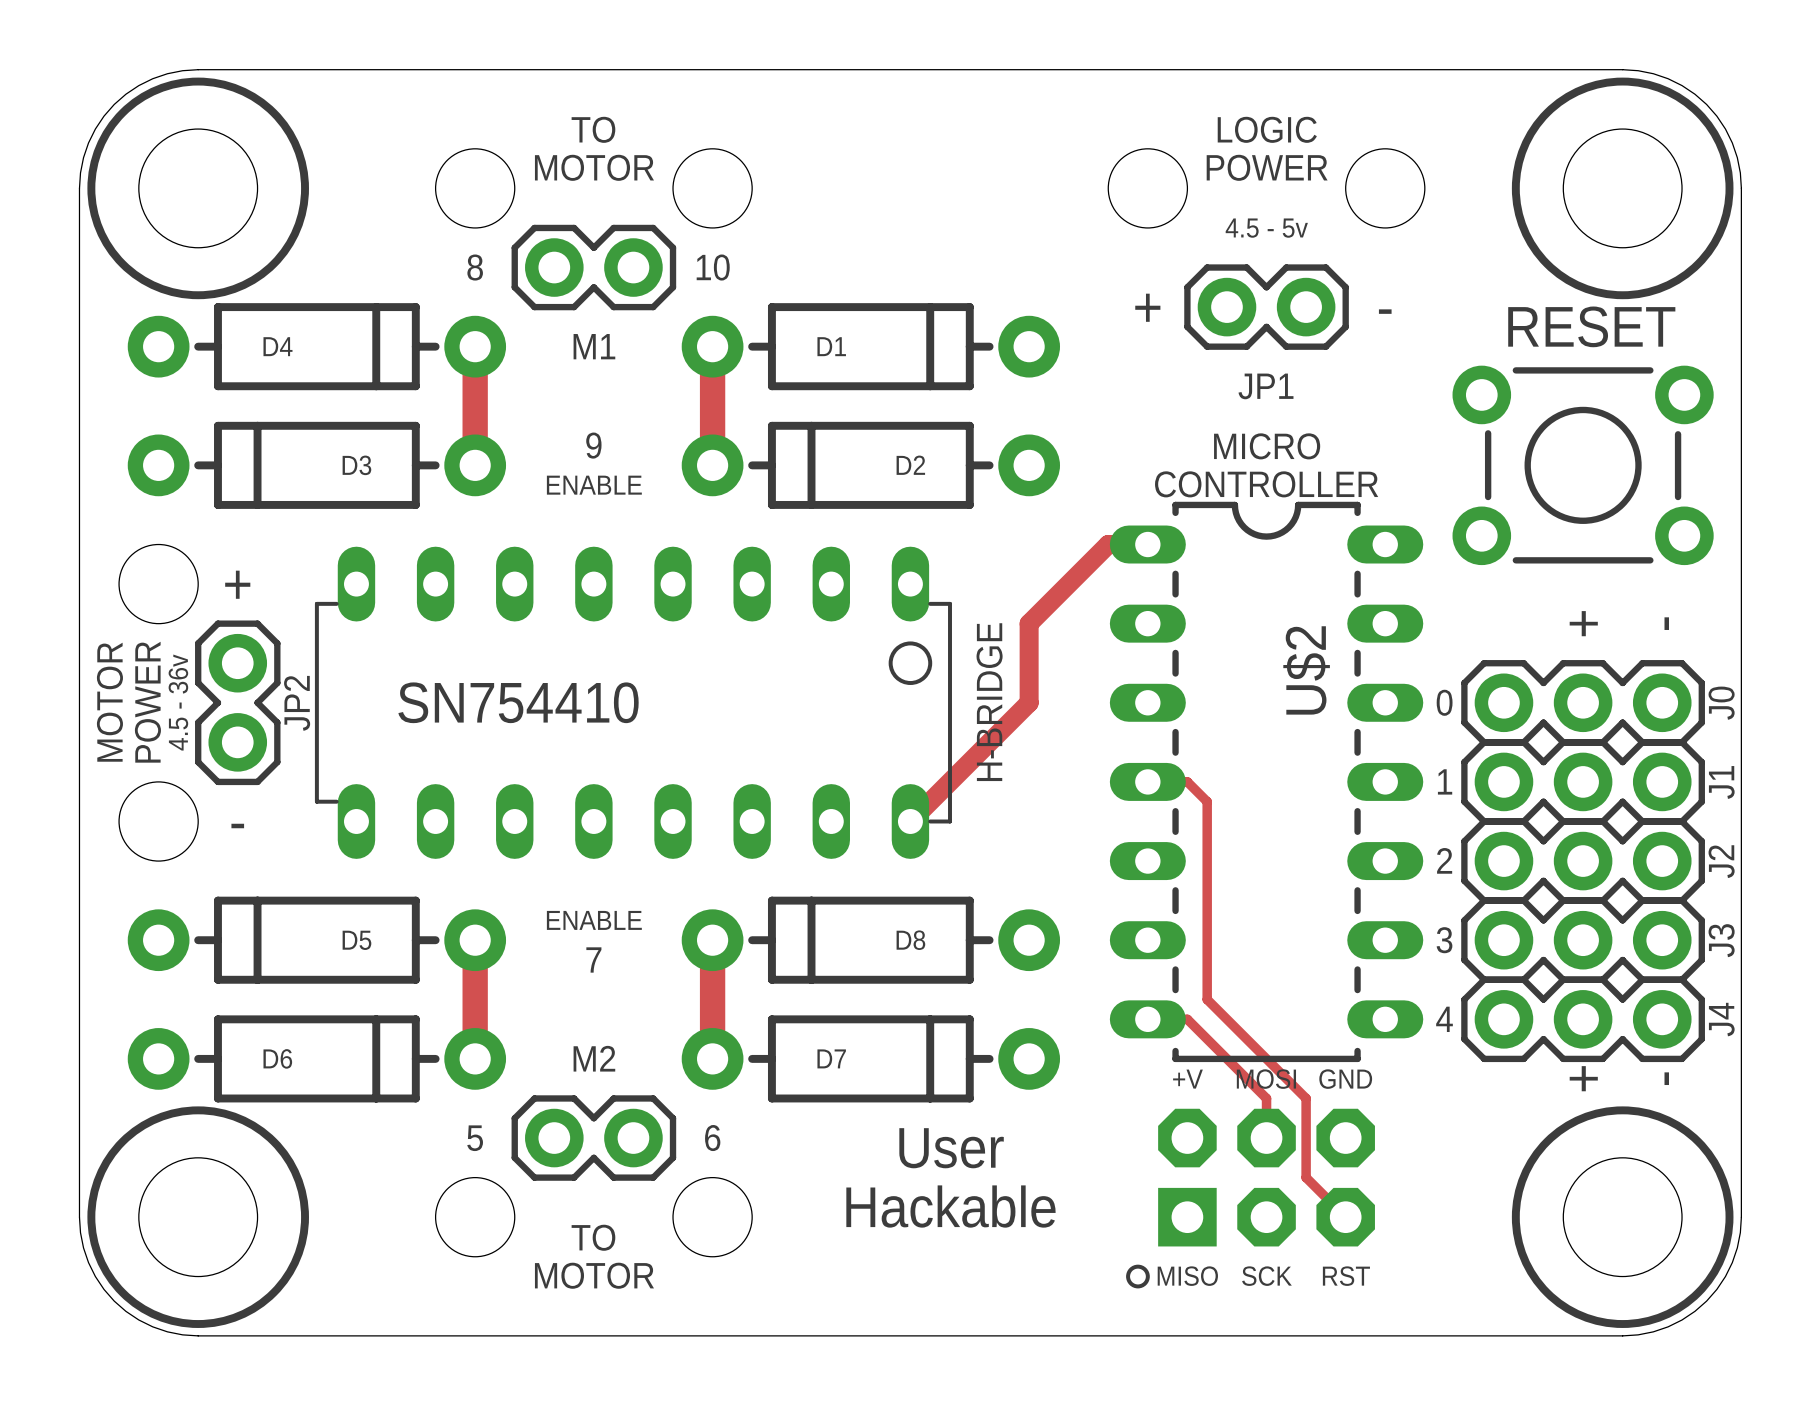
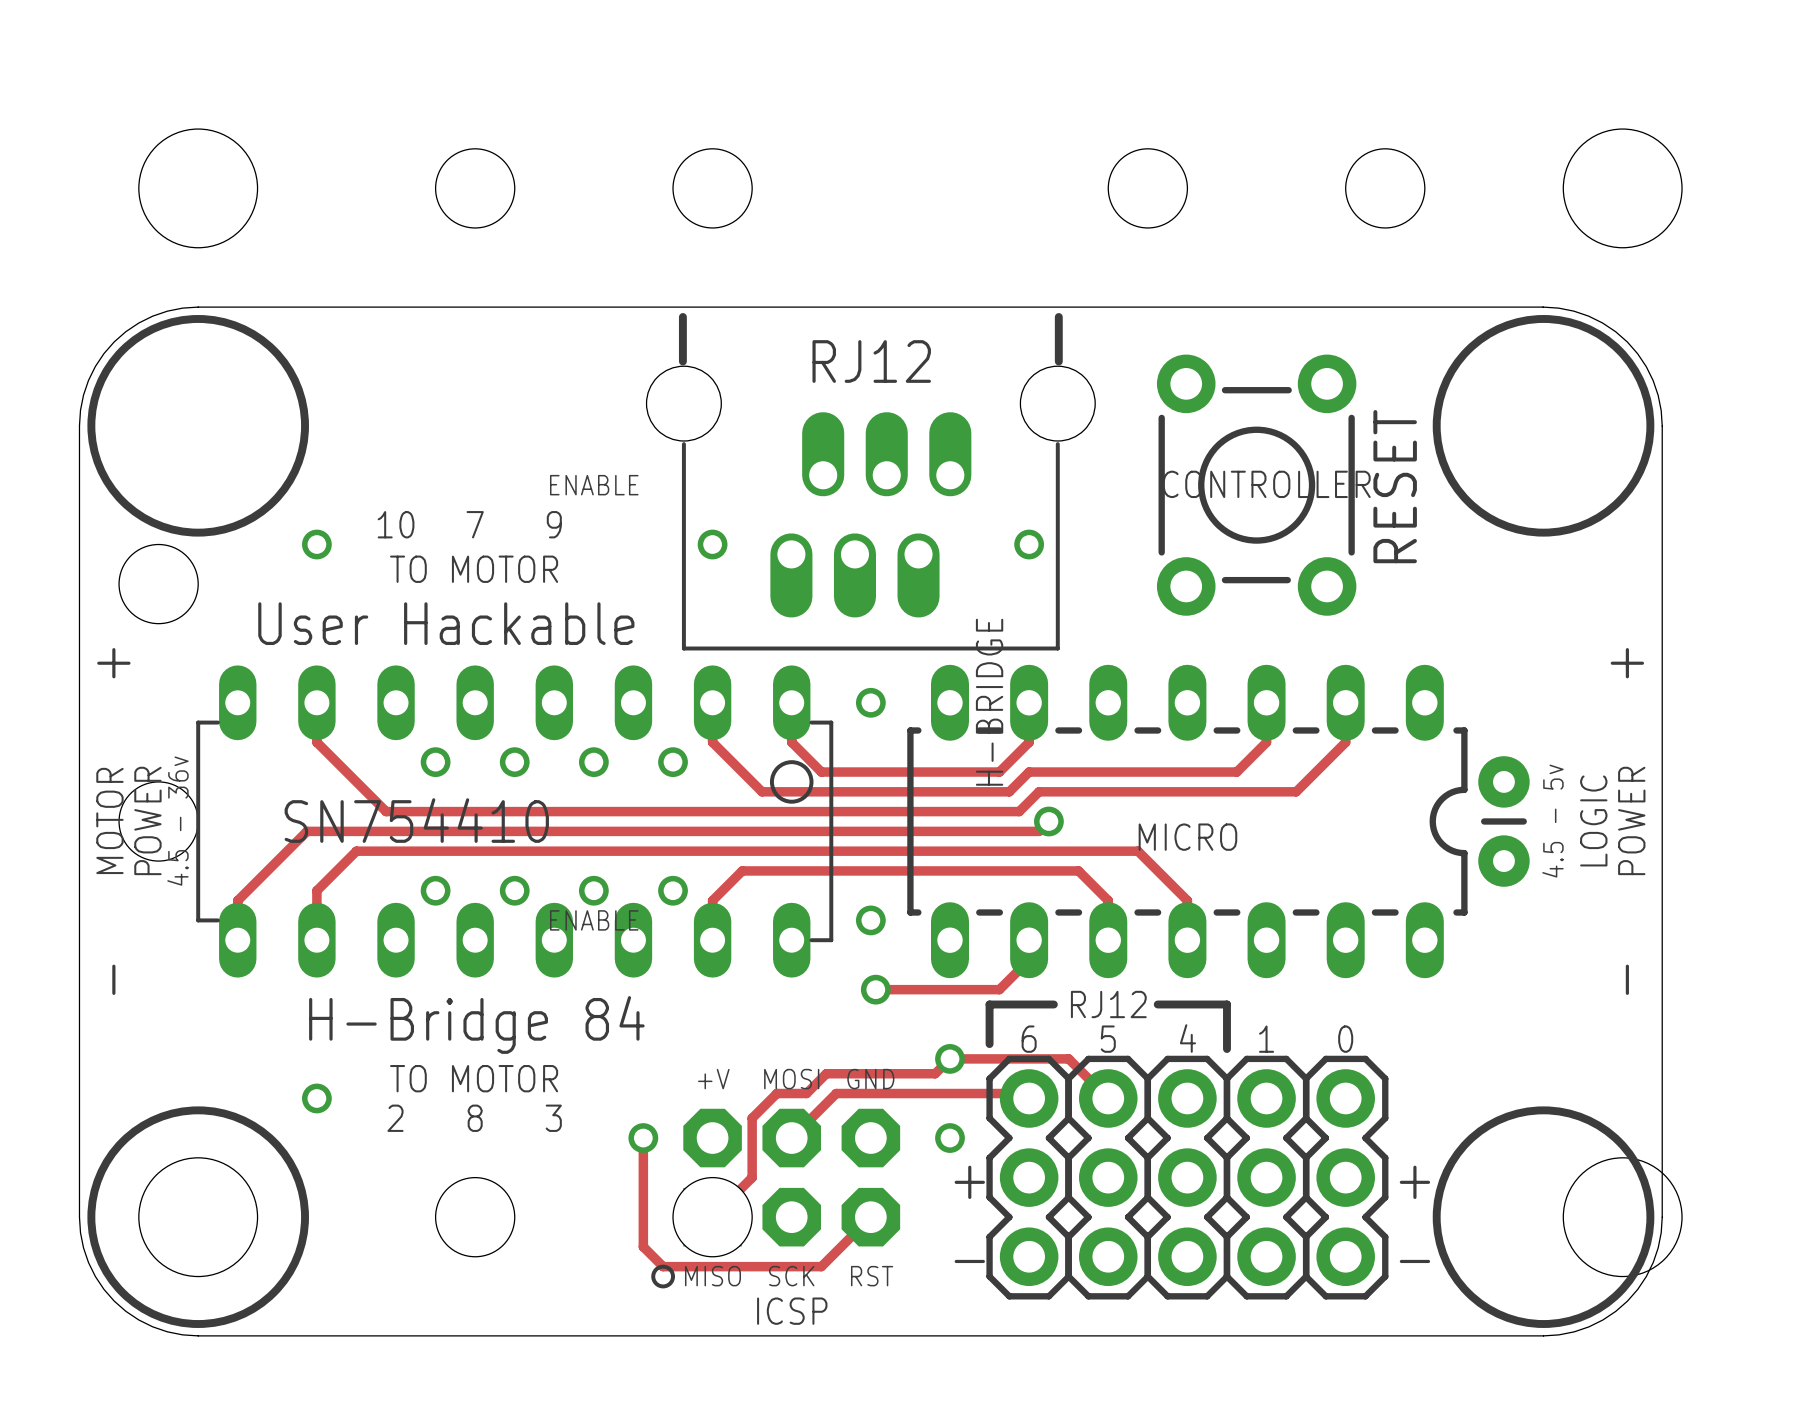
text: TO (593, 129) -> none
text rotation: 0° (1267, 129) -> 90° counterclockwise (1593, 820)
text position: LOGIC (1267, 129) -> LOGIC (1593, 820)
text: MOTOR (594, 167) -> none
text: POWER (1267, 167) -> none
drawing position: (198, 188) -> (198, 425)
drawing position: (1622, 188) -> (1543, 425)
text rotation: 0° (1266, 228) -> 90° counterclockwise (1552, 821)
text position: 4.5 - 5v (1266, 228) -> 4.5 - 5v (1552, 821)
text: 8 (475, 267) -> none
M1: (593, 267) -> none
text position: 10 (713, 267) -> 10 (396, 524)
text: + (1147, 307) -> none
JP1: (1266, 307) -> none
text: - (1385, 311) -> none
line: none -> (682, 316) (682, 361)
line: none -> (1058, 316) (1058, 361)
D4: (316, 346) -> none
track: (475, 346) (475, 465) -> none
track: (712, 346) (712, 465) -> none
D1: (870, 346) -> none
text: none -> RJ12 (871, 361)
board edge: (79, 425) (79, 188) (83, 157) (95, 129) (114, 104) (138, 85) (167, 73) (198, 69) (1622, 69) (1653, 73) (1682, 85) (1706, 104) (1725, 129) (1737, 157) (1741, 188) (1740, 1232) (1737, 1247) (1725, 1276) (1706, 1301) (1682, 1319) (1653, 1331) (1638, 1334) (1543, 1335) -> (79, 425) (83, 395) (88, 380) (95, 366) (114, 341) (138, 323) (167, 311) (182, 308) (1543, 307) (1573, 311) (1602, 323) (1627, 341) (1646, 366) (1653, 380) (1661, 410) (1662, 1217) (1658, 1247) (1653, 1262) (1646, 1276) (1627, 1301) (1602, 1319) (1588, 1326) (1574, 1331) (1543, 1335)
text position: 9 (593, 445) -> 9 (554, 524)
text position: MICRO (1267, 446) -> MICRO (1187, 837)
D3: (316, 465) -> none
D2: (870, 465) -> none
RESET rotation: 0° (1583, 465) -> 90° clockwise (1256, 485)
RESET position: (1583, 465) -> (1256, 485)
part: none -> (870, 508)
via: none -> (316, 544)
via: none -> (712, 544)
via: none -> (1029, 544)
track: (1147, 544) (1108, 544) (1029, 623) (1029, 702) (910, 821) -> none
text: none -> TO MOTOR (474, 569)
text rotation: 0° (237, 584) -> 90° counterclockwise (113, 663)
text position: + (237, 584) -> + (113, 663)
text: none -> User Hackable (446, 623)
text position: + (1583, 623) -> + (1627, 663)
text: - (1666, 623) -> none
text position: MOTOR (109, 702) -> MOTOR (109, 820)
text position: POWER (147, 702) -> POWER (147, 820)
text position: 4.5 - 36v (178, 702) -> 4.5 - 36v (177, 821)
JP2: (237, 702) -> none
track: none -> (316, 702) (316, 742) (386, 811) (1019, 811) (1039, 791) (1296, 791) (1345, 742) (1345, 702)
SN754410 position: (633, 702) -> (514, 821)
track: none -> (712, 702) (712, 742) (762, 791) (1009, 791) (1029, 772) (1236, 772) (1266, 742) (1266, 702)
track: none -> (791, 702) (791, 742) (821, 772) (999, 772) (1029, 742) (1029, 702)
via: none -> (870, 702)
text position: 0 (1444, 702) -> 0 (1345, 1039)
J0: (1583, 702) -> none
via: none -> (435, 762)
via: none -> (514, 762)
via: none -> (593, 762)
via: none -> (673, 762)
track: (1147, 781) (1187, 781) (1207, 801) (1207, 999) (1306, 1098) (1306, 1177) (1345, 1217) -> none
U$2: (1266, 781) -> none
text position: 1 (1445, 781) -> 1 (1266, 1039)
J1: (1583, 781) -> none
text: none -> POWER (1631, 820)
track: none -> (1048, 821) (1039, 831) (307, 831) (237, 900) (237, 940)
via: none -> (1048, 821)
part: none -> (1187, 821)
part: none -> (1503, 821)
text rotation: 0° (237, 826) -> 90° counterclockwise (113, 979)
text position: - (237, 826) -> - (113, 979)
text: 2 (1444, 860) -> none
J2: (1583, 861) -> none
via: none -> (435, 890)
via: none -> (514, 890)
via: none -> (593, 890)
via: none -> (673, 890)
via: none -> (870, 920)
track: none -> (316, 940) (316, 890) (356, 851) (1137, 851) (1187, 900) (1187, 940)
D5: (316, 940) -> none
track: (475, 940) (475, 1058) -> none
track: (712, 940) (712, 1058) -> (712, 940) (712, 900) (742, 870) (1078, 870) (1108, 900) (1108, 940)
D8: (870, 940) -> none
track: none -> (1029, 940) (1029, 959) (999, 989) (875, 989)
text: 3 (1444, 940) -> none
J3: (1583, 940) -> none
text position: 7 (593, 959) -> 7 (475, 524)
via: none -> (875, 989)
line: none -> (1053, 1004) (989, 1004) (989, 1044)
text: none -> RJ12 (1108, 1004)
line: none -> (1157, 1004) (1226, 1004) (1226, 1049)
track: (1147, 1019) (1187, 1019) (1266, 1098) (1266, 1138) -> none
text position: 4 (1444, 1019) -> 4 (1187, 1038)
J4: (1583, 1019) -> none
text: none -> H-Bridge 84 (476, 1024)
D6: (316, 1058) -> none
D7: (870, 1058) -> none
via: none -> (950, 1058)
text: none -> TO MOTOR (474, 1078)
text rotation: 0° (1583, 1078) -> 90° clockwise (1414, 1182)
text position: + (1583, 1078) -> + (1414, 1182)
text position: - (1666, 1078) -> - (1627, 979)
via: none -> (316, 1098)
track: none -> (1029, 1098) (1024, 1093) (836, 1093) (791, 1138)
track: none -> (1108, 1098) (1068, 1058) (950, 1058) (935, 1073) (826, 1073) (806, 1093) (776, 1093) (752, 1118) (752, 1177) (712, 1217)
part footprint: [1126, 1108, 1375, 1289] -> [1223, 1055, 1310, 1300]
text: none -> 2 (395, 1118)
text: none -> 8 (475, 1118)
text: none -> 3 (553, 1118)
text position: 5 (475, 1138) -> 5 (1108, 1039)
M2: (593, 1138) -> none
track: none -> (643, 1138) (643, 1246) (663, 1266) (821, 1266) (870, 1217)
via: none -> (643, 1138)
text position: 6 (712, 1138) -> 6 (1029, 1039)
via: none -> (950, 1138)
text: User (951, 1148) -> none
part: none -> (1029, 1177)
part: none -> (1108, 1177)
part: none -> (1187, 1177)
part: none -> (1345, 1177)
text: none -> + (969, 1182)
part: none -> (775, 1198)
text: Hackable (950, 1206) -> none
drawing position: (1622, 1217) -> (1543, 1217)
text: TO (593, 1237) -> none
text: none -> - (969, 1261)
text: none -> - (1414, 1261)
text: MOTOR (594, 1275) -> none
text: none -> ICSP (792, 1311)

